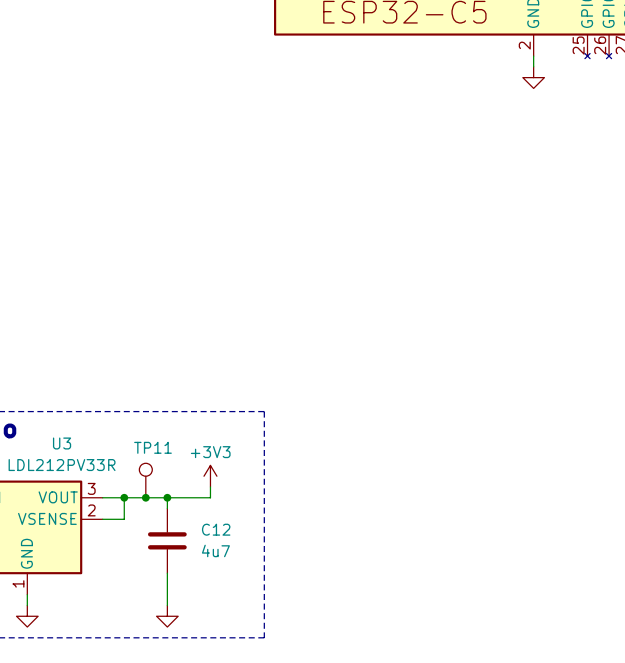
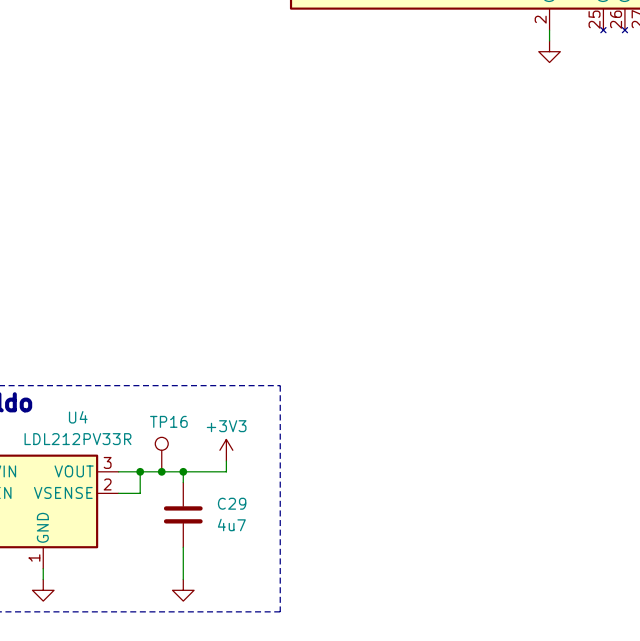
U3 name: U3 (62, 443) -> U4 (78, 417)
TP11 name: TP11 (152, 447) -> TP16 (168, 421)
C12 name: C12 (216, 529) -> C29 (232, 503)

